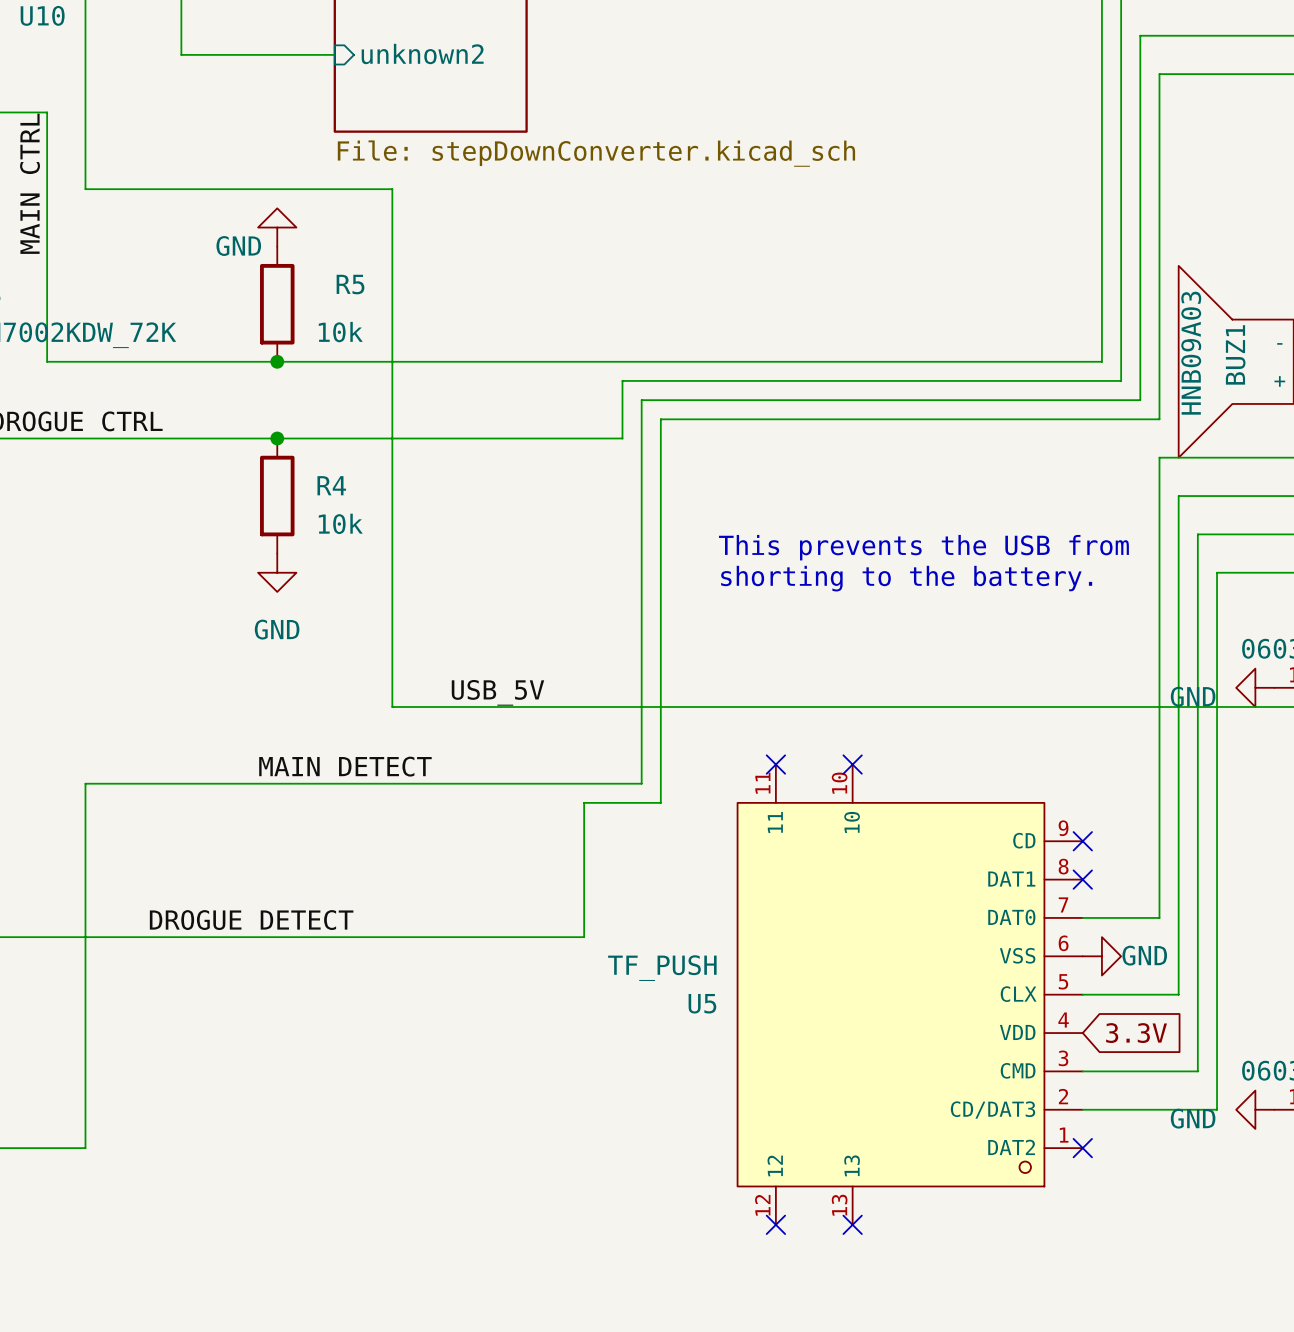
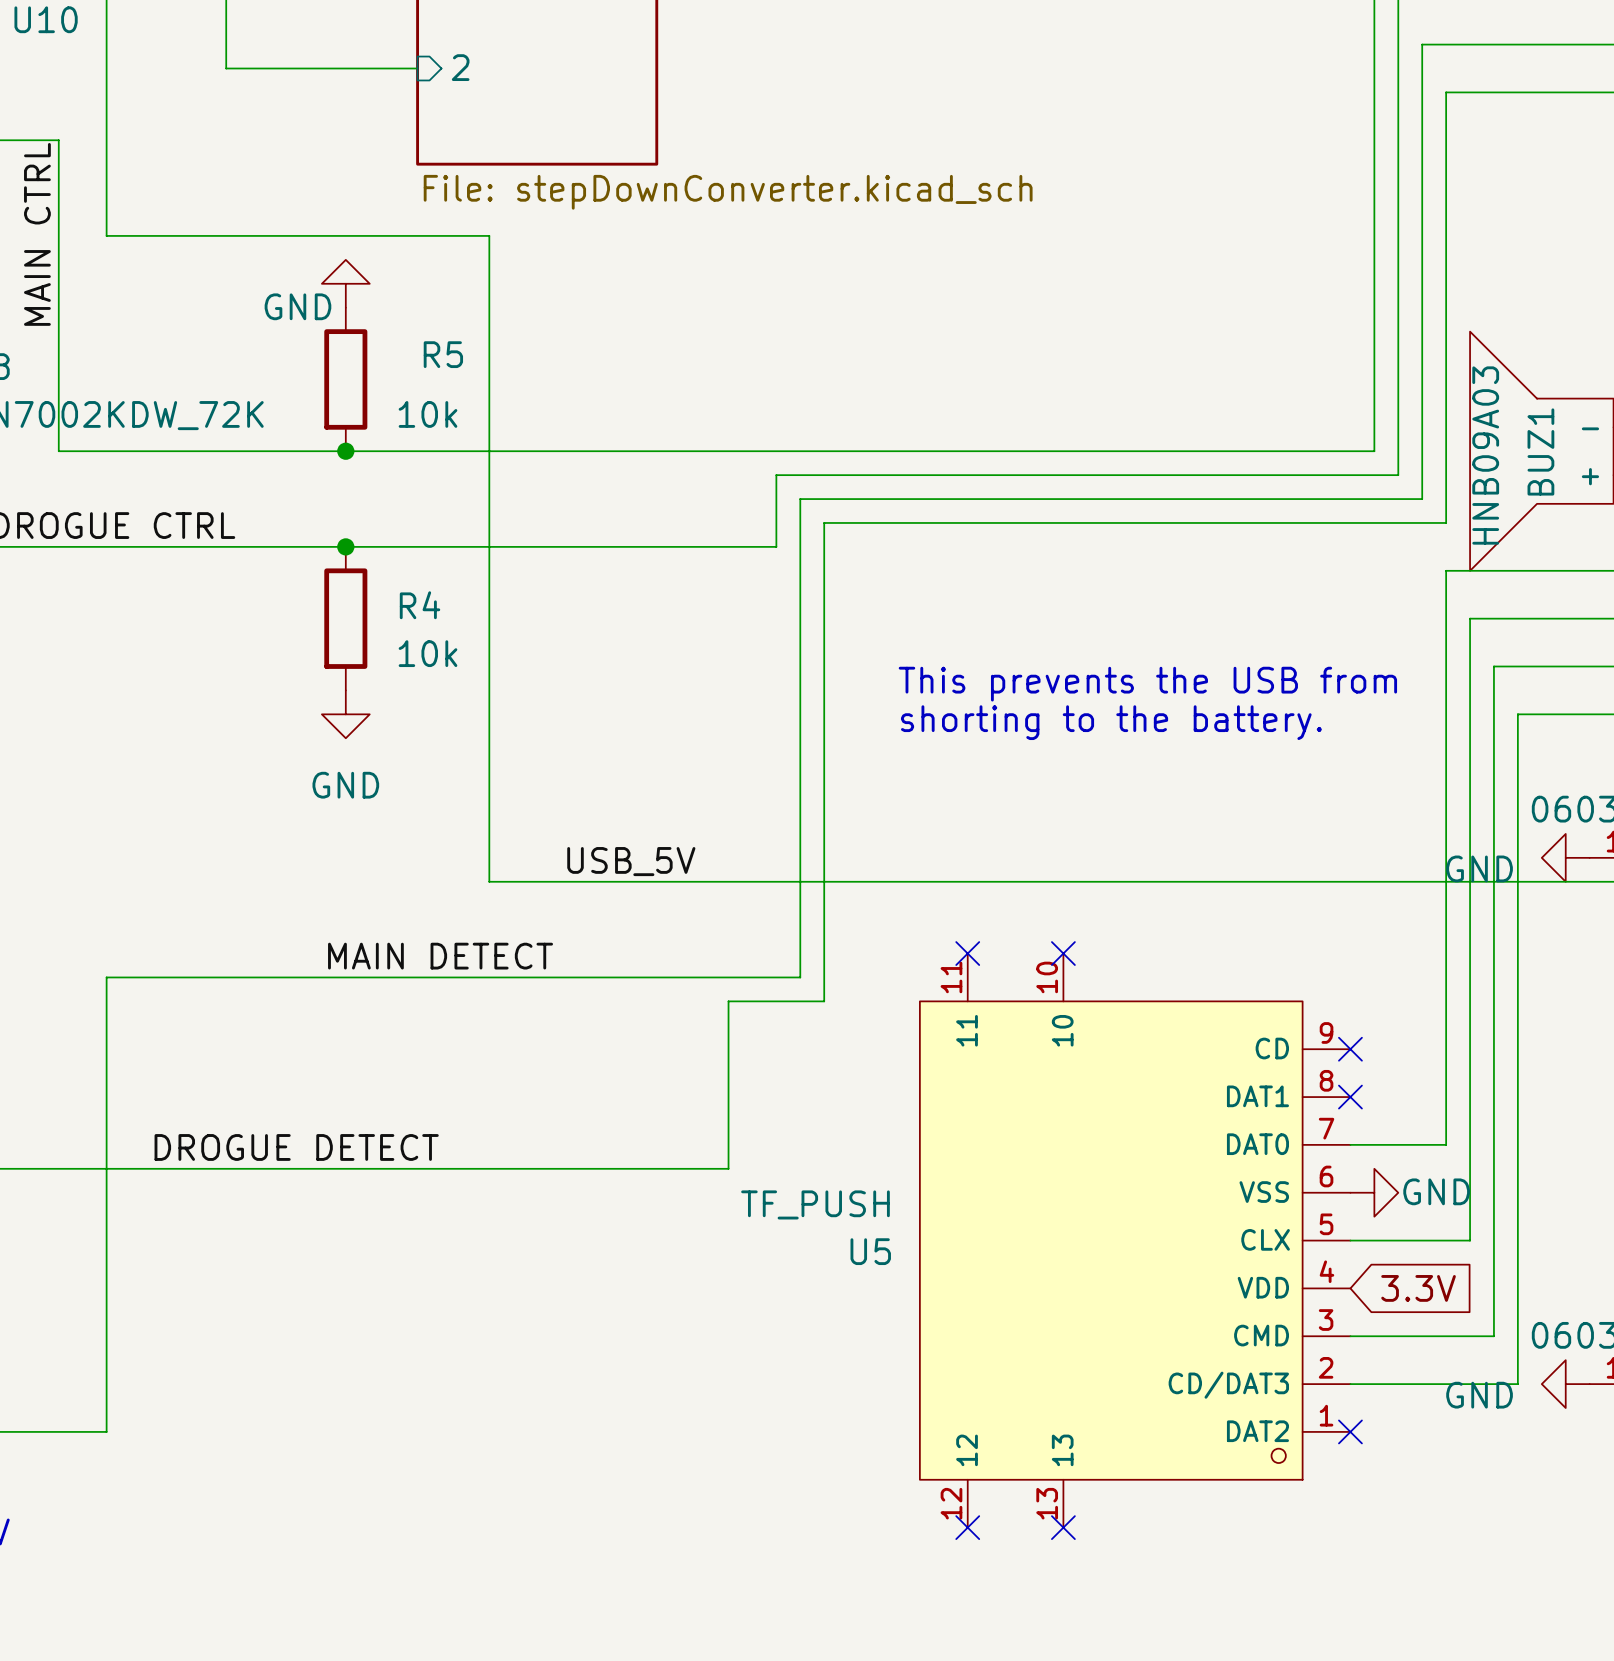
sheet pin: unknown2 (422, 53) -> 2 (460, 67)

